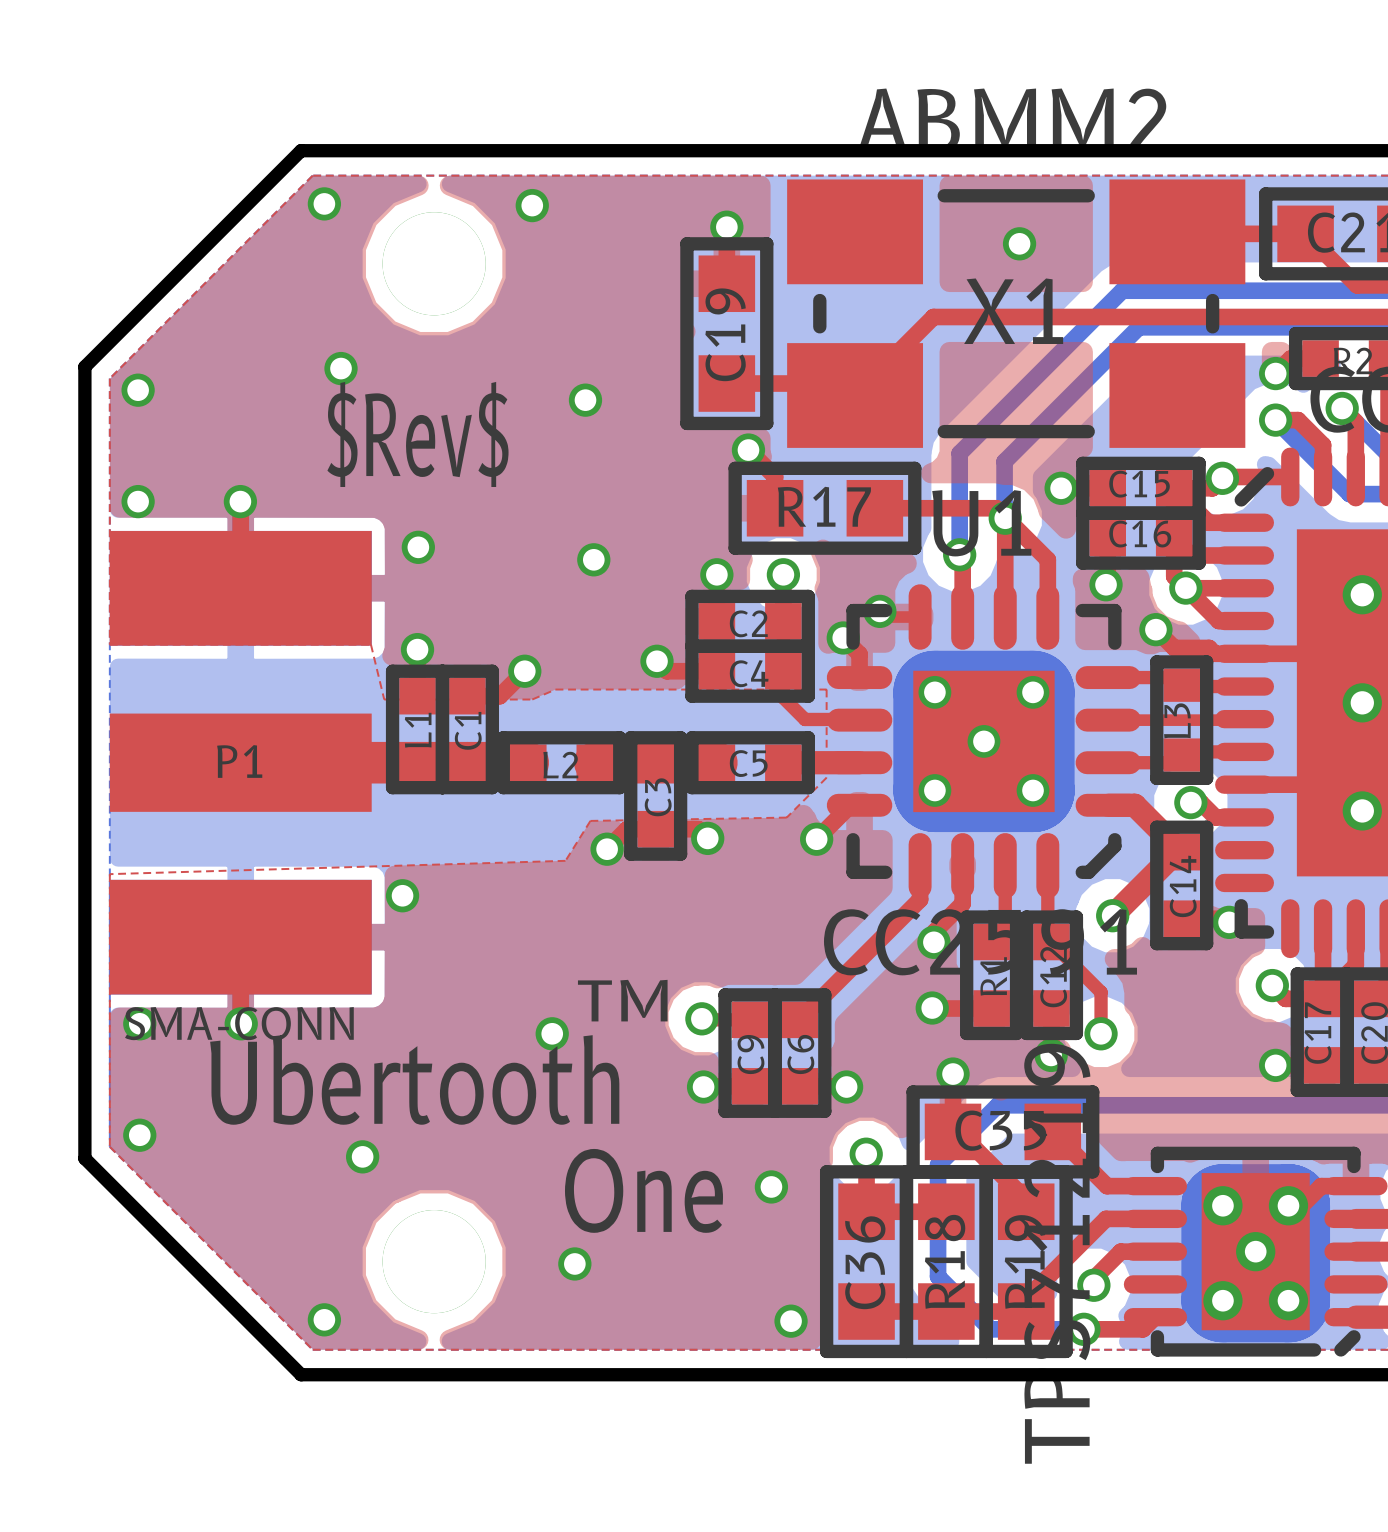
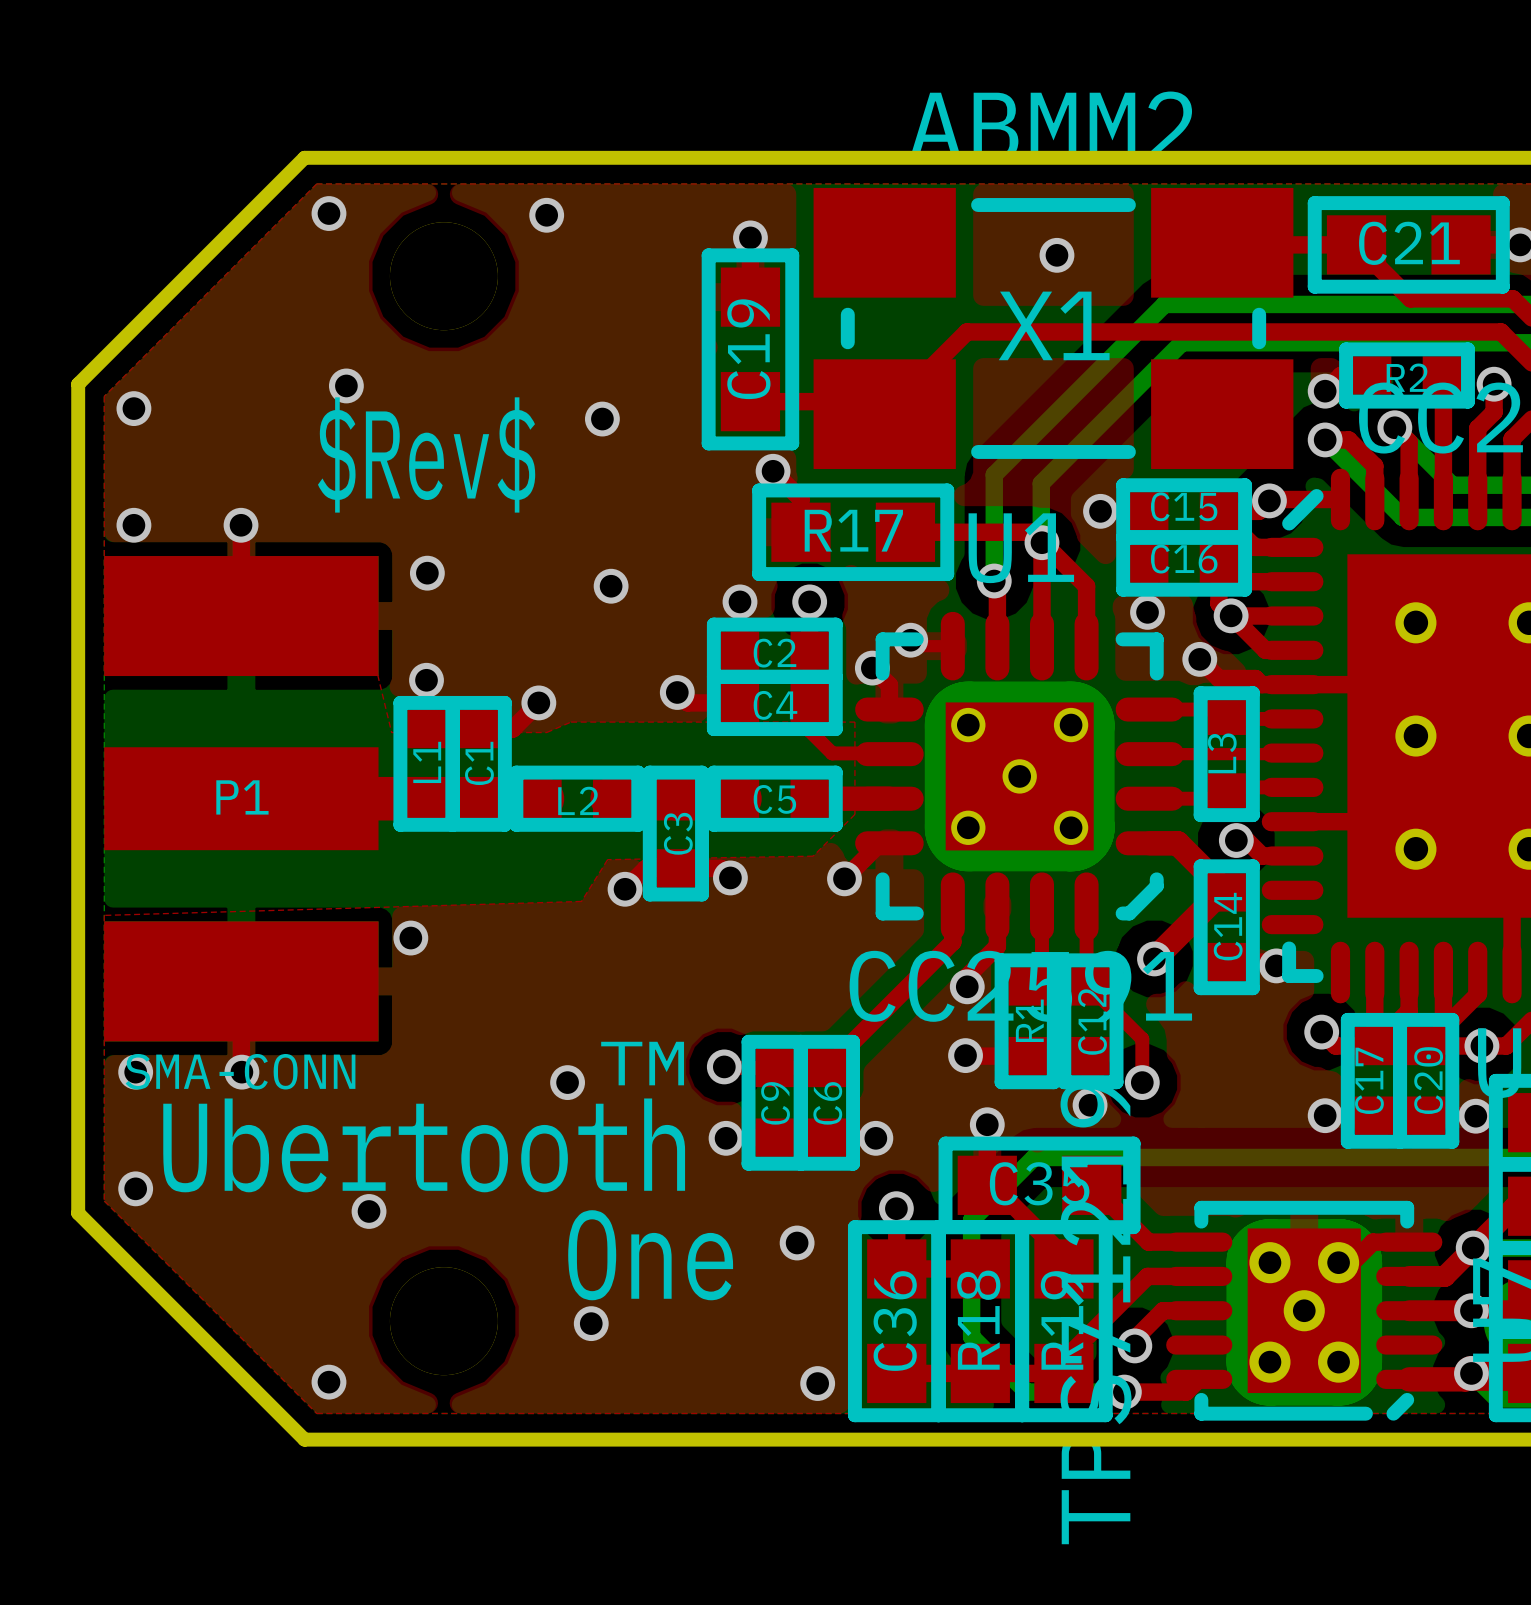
text position: TM (622, 1000) -> TM (642, 1063)
text position: Ubertooth (414, 1079) -> Ubertooth (424, 1145)
text position: One (643, 1190) -> One (650, 1255)

